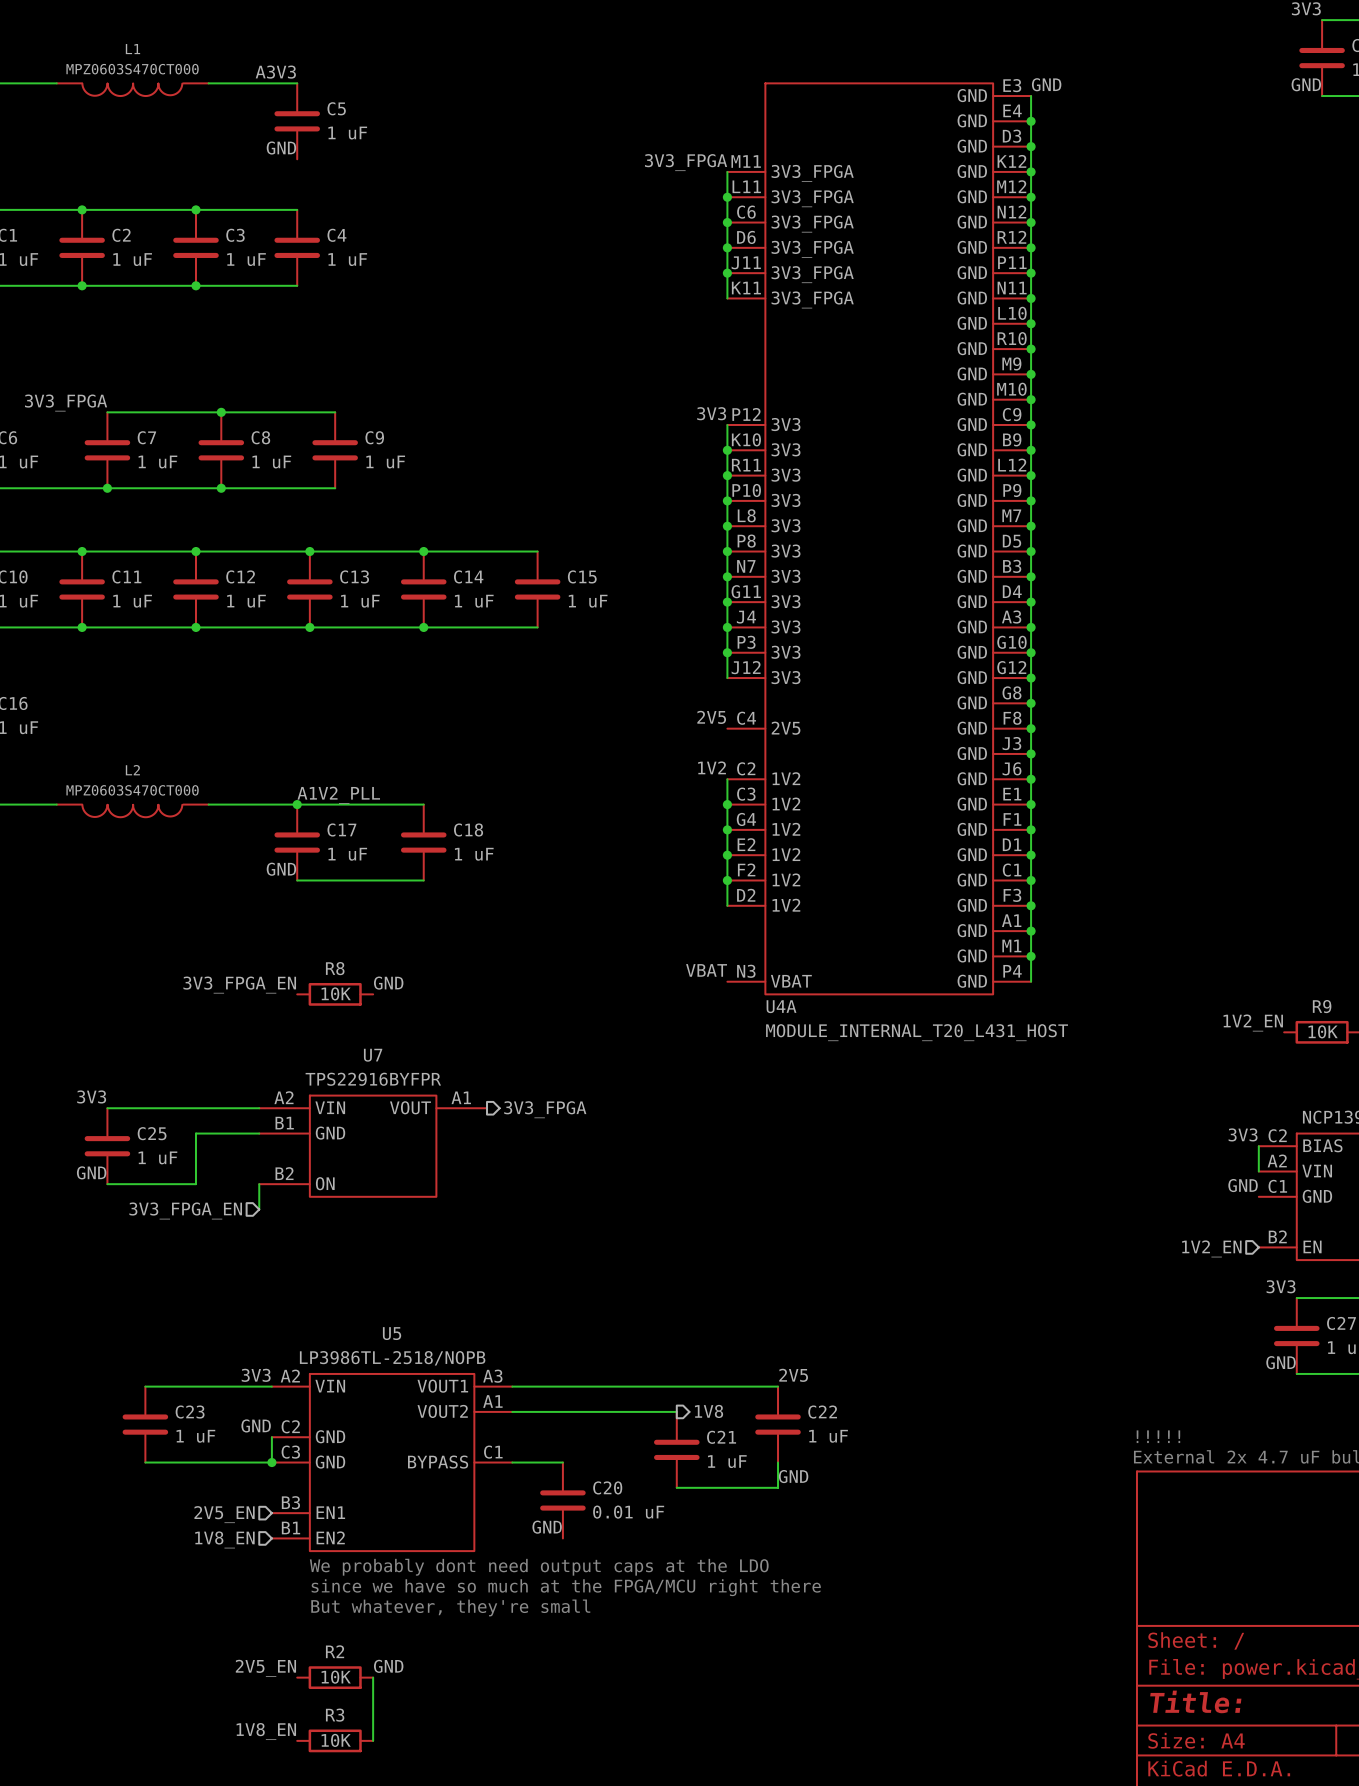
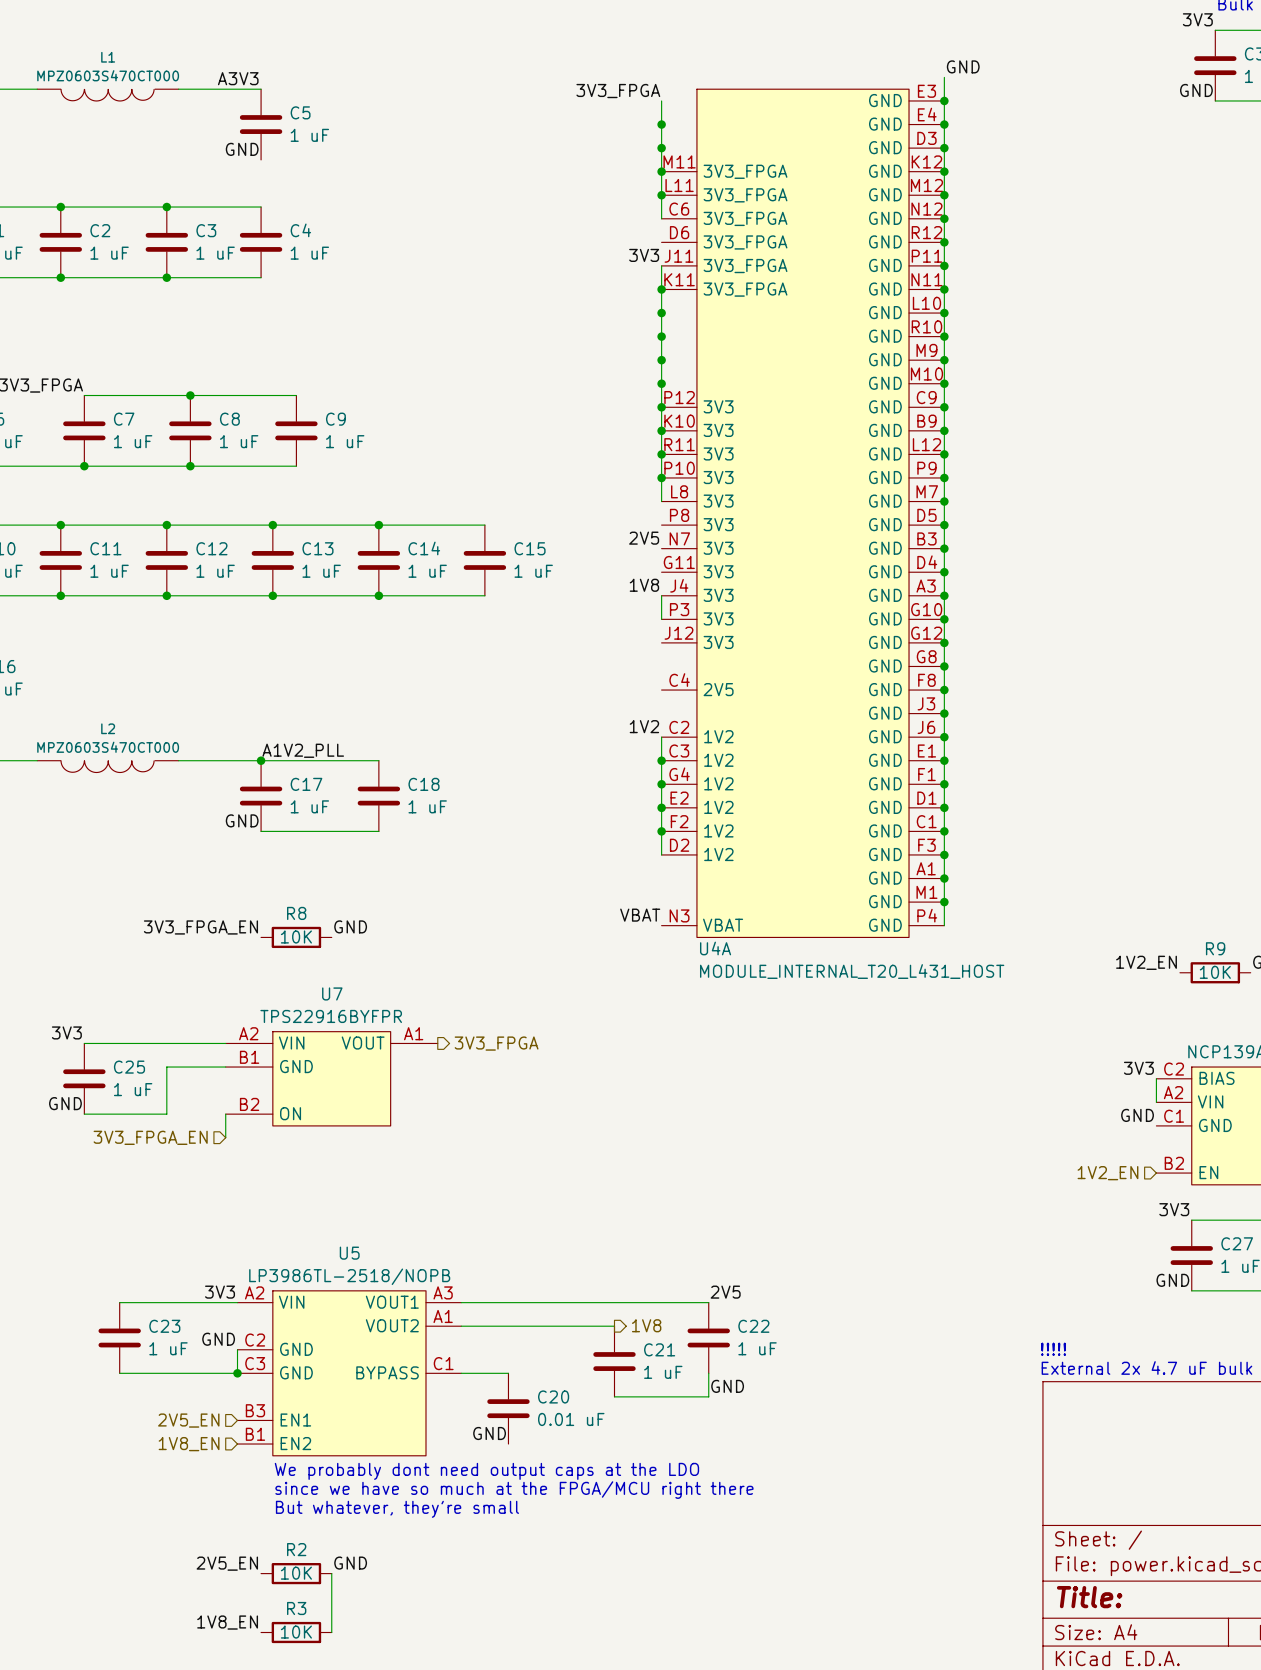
wire: none -> (944, 77) (944, 100)
label position: GND (1046, 84) -> GND (963, 66)
wire: none -> (661, 100) (661, 171)
junction: none -> (944, 100)
junction: none -> (661, 124)
junction: none -> (661, 148)
label position: 3V3_FPGA (686, 162) -> 3V3_FPGA (618, 91)
junction: none -> (661, 171)
wire: (727, 222) (727, 273) -> none
junction: (727, 222) -> none
junction: (727, 247) -> none
junction: (727, 273) -> none
wire: none -> (661, 289) (661, 407)
junction: none -> (661, 289)
junction: none -> (661, 313)
junction: none -> (661, 336)
junction: none -> (661, 360)
junction: none -> (661, 383)
label position: 3V3 (711, 413) -> 3V3 (644, 255)
junction: none -> (661, 407)
wire: (727, 526) (727, 627) -> none
junction: (727, 526) -> none
junction: (727, 551) -> none
junction: (727, 576) -> none
junction: (727, 602) -> none
label: none -> 1V8 (644, 585)
junction: (727, 627) -> none
wire: (727, 652) (727, 678) -> none
junction: (727, 652) -> none
label position: 2V5 (711, 717) -> 2V5 (644, 538)

